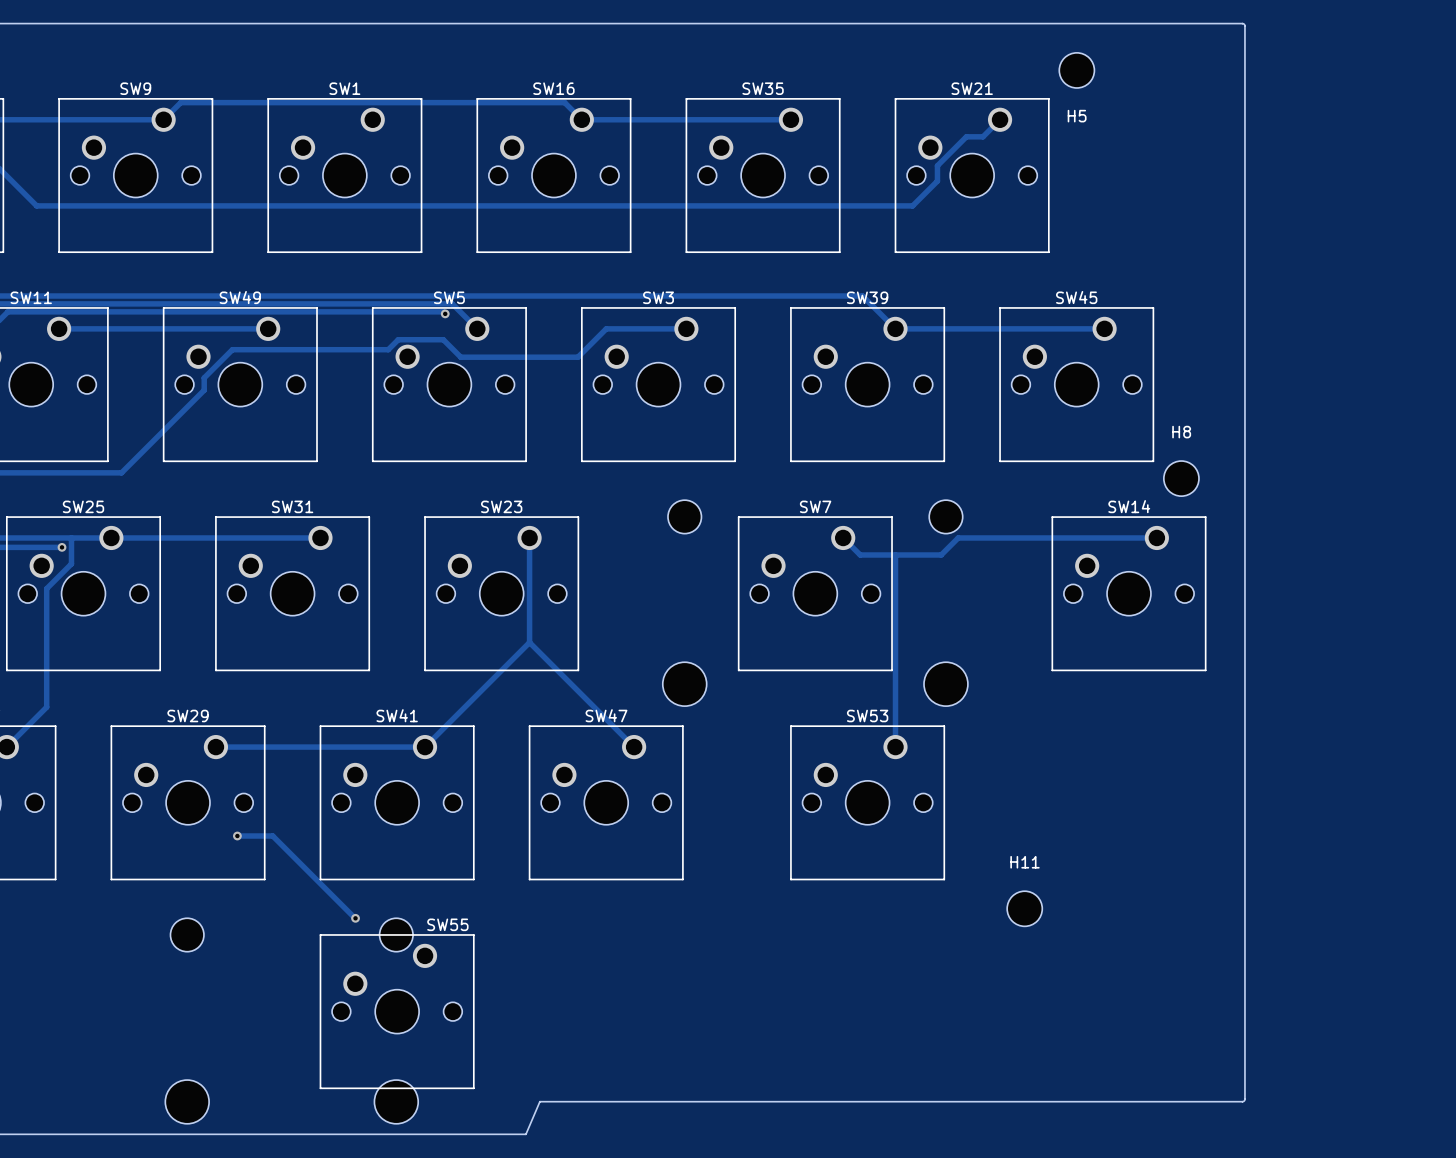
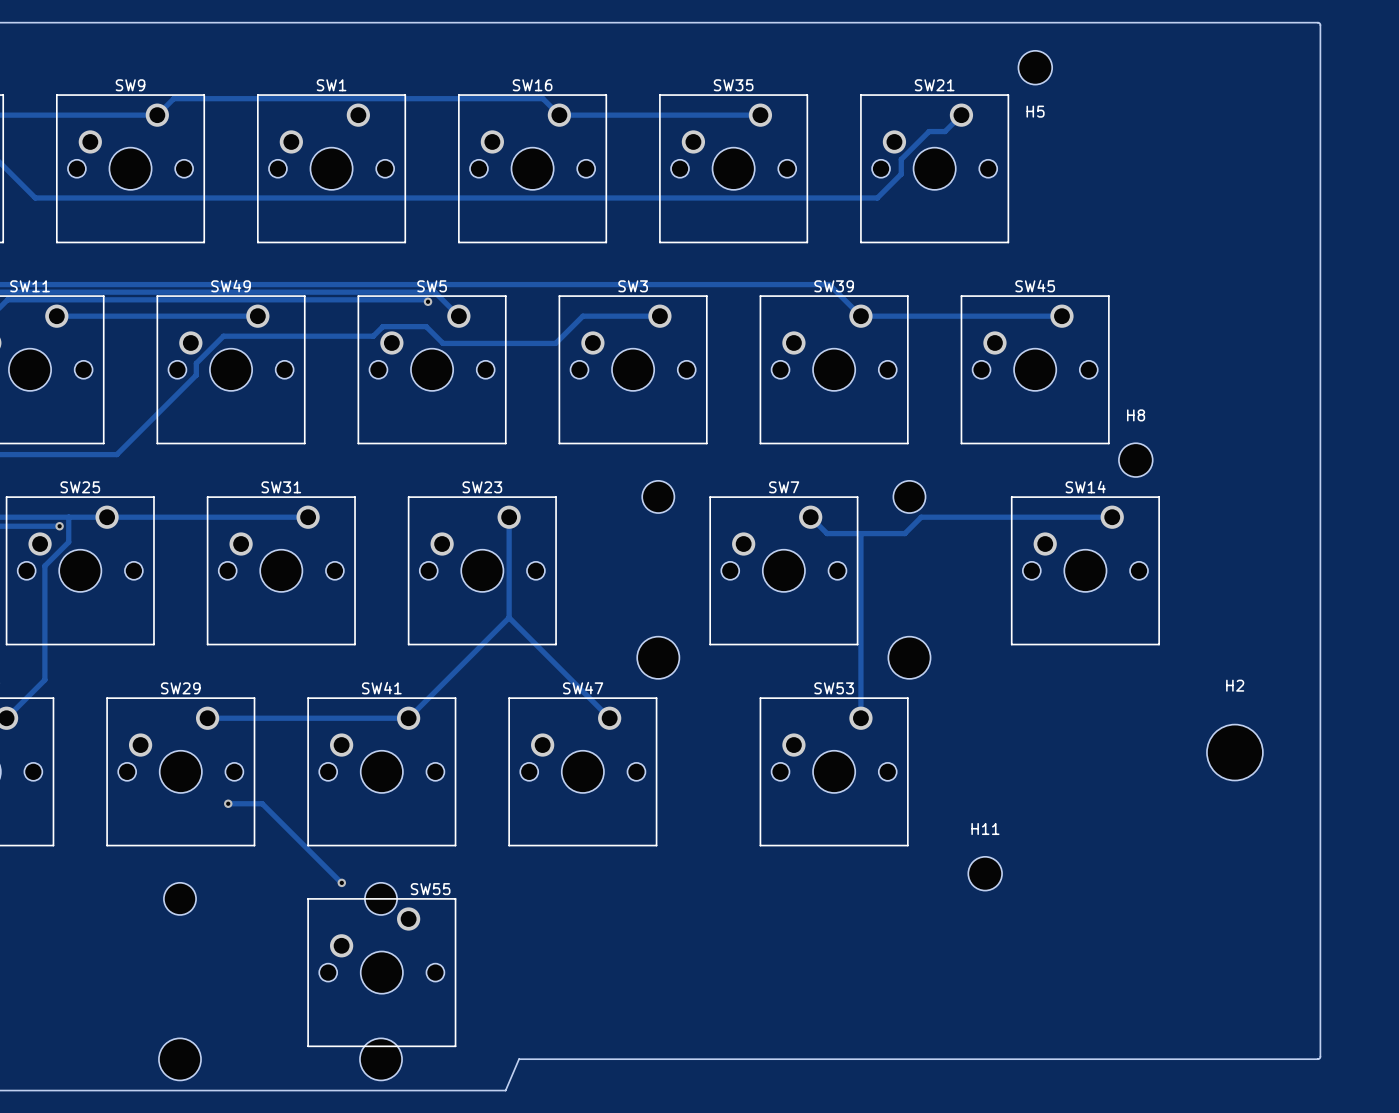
board edge: (1242, 23) (1244, 26) (1244, 1099) (1242, 1101) -> (1194, 22) (1317, 22) (1320, 24) (1320, 1056) (1318, 1059) (1194, 1059)
H2: none -> (1234, 752)

